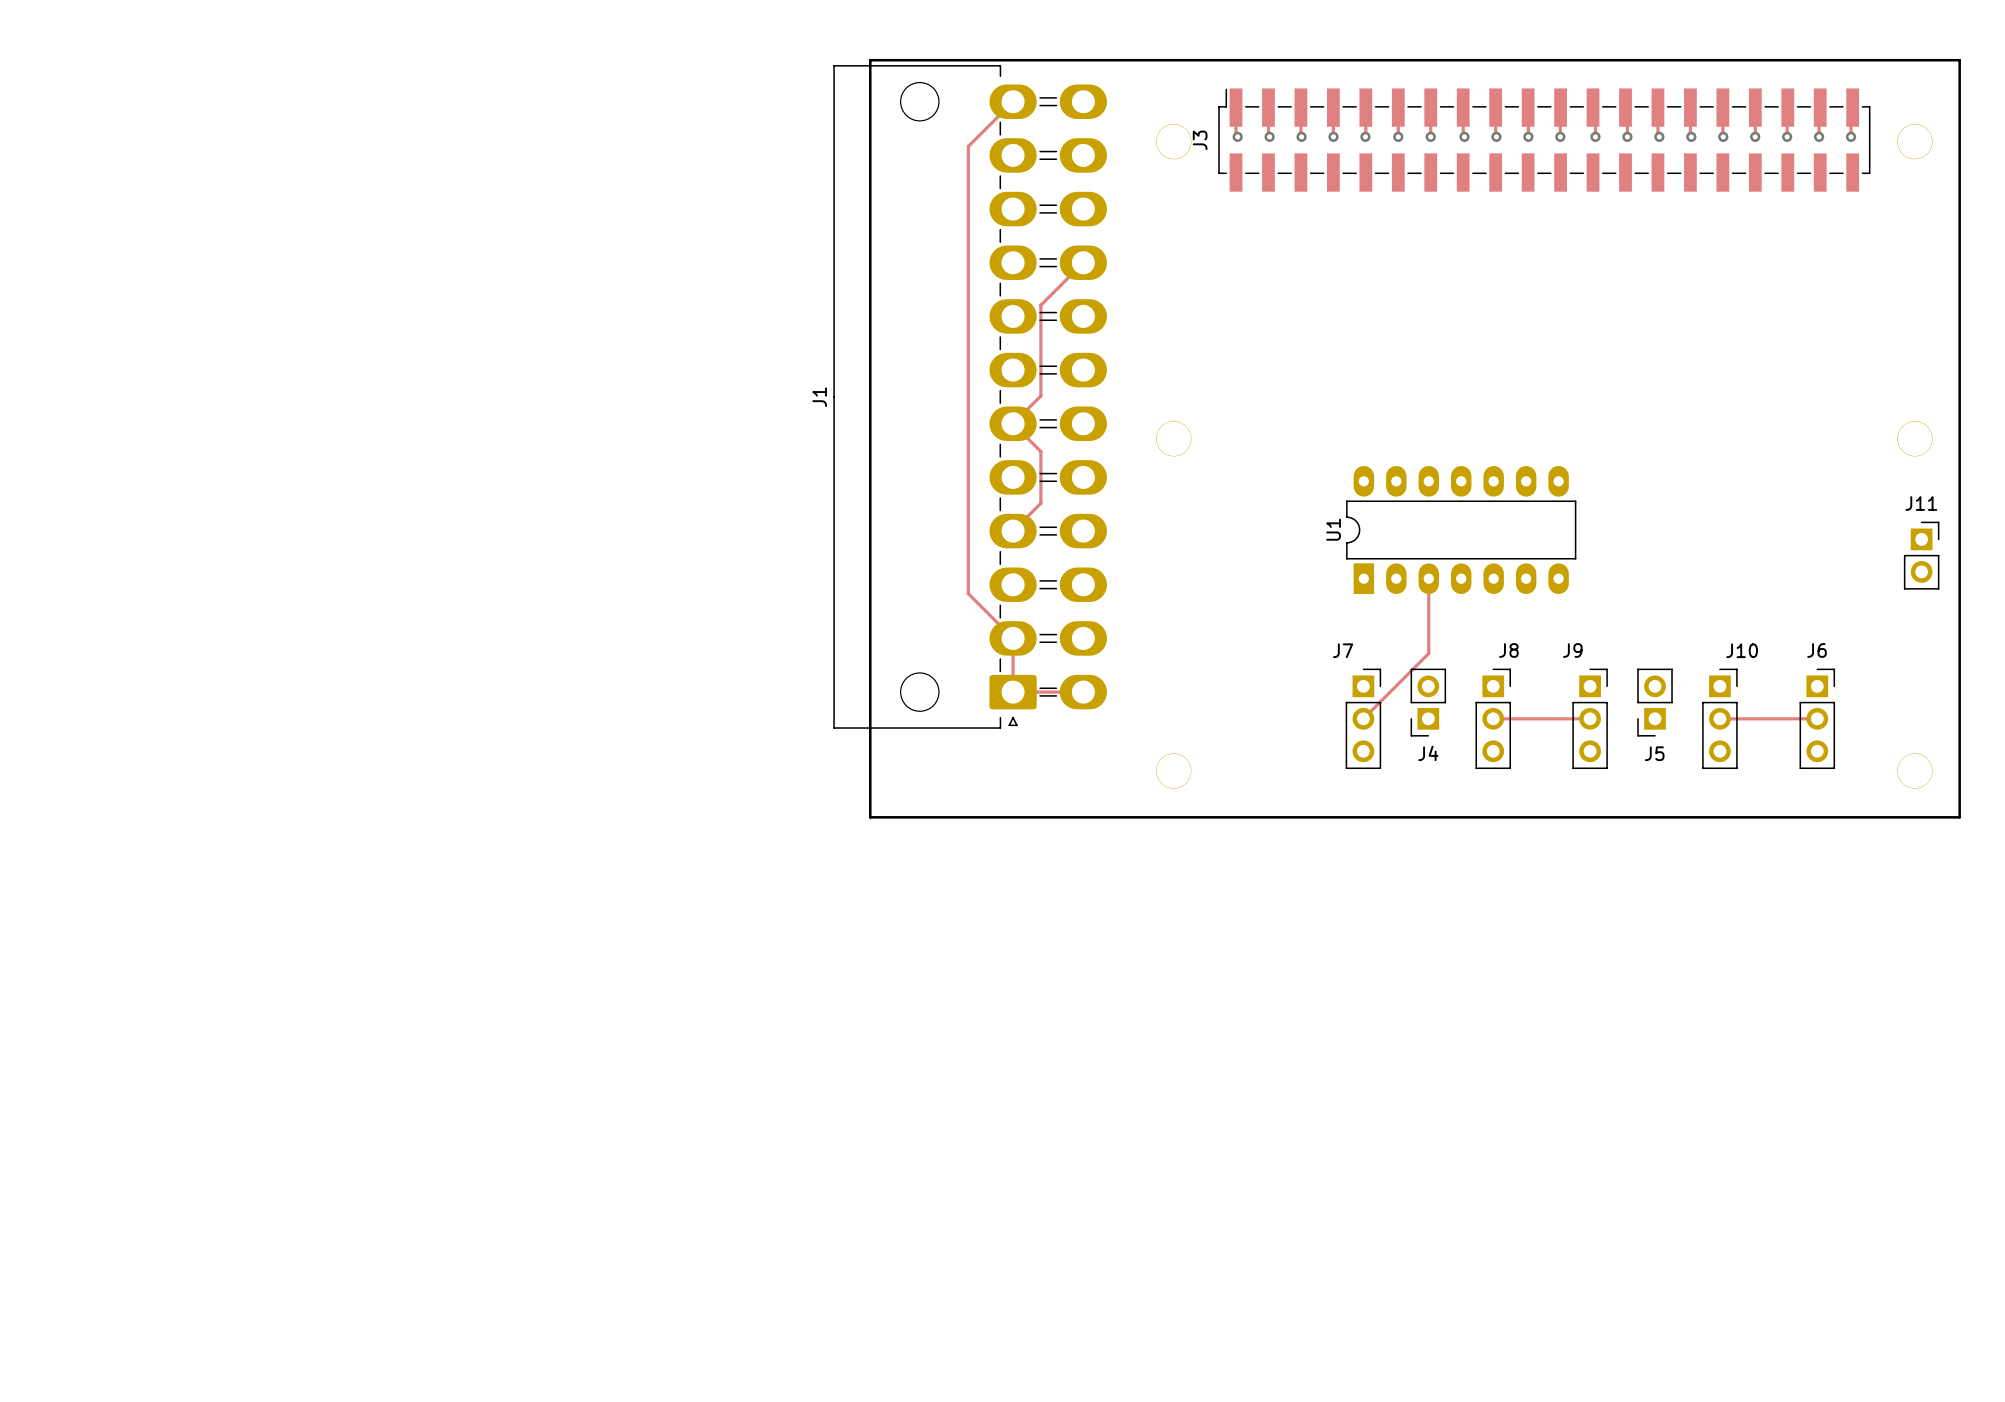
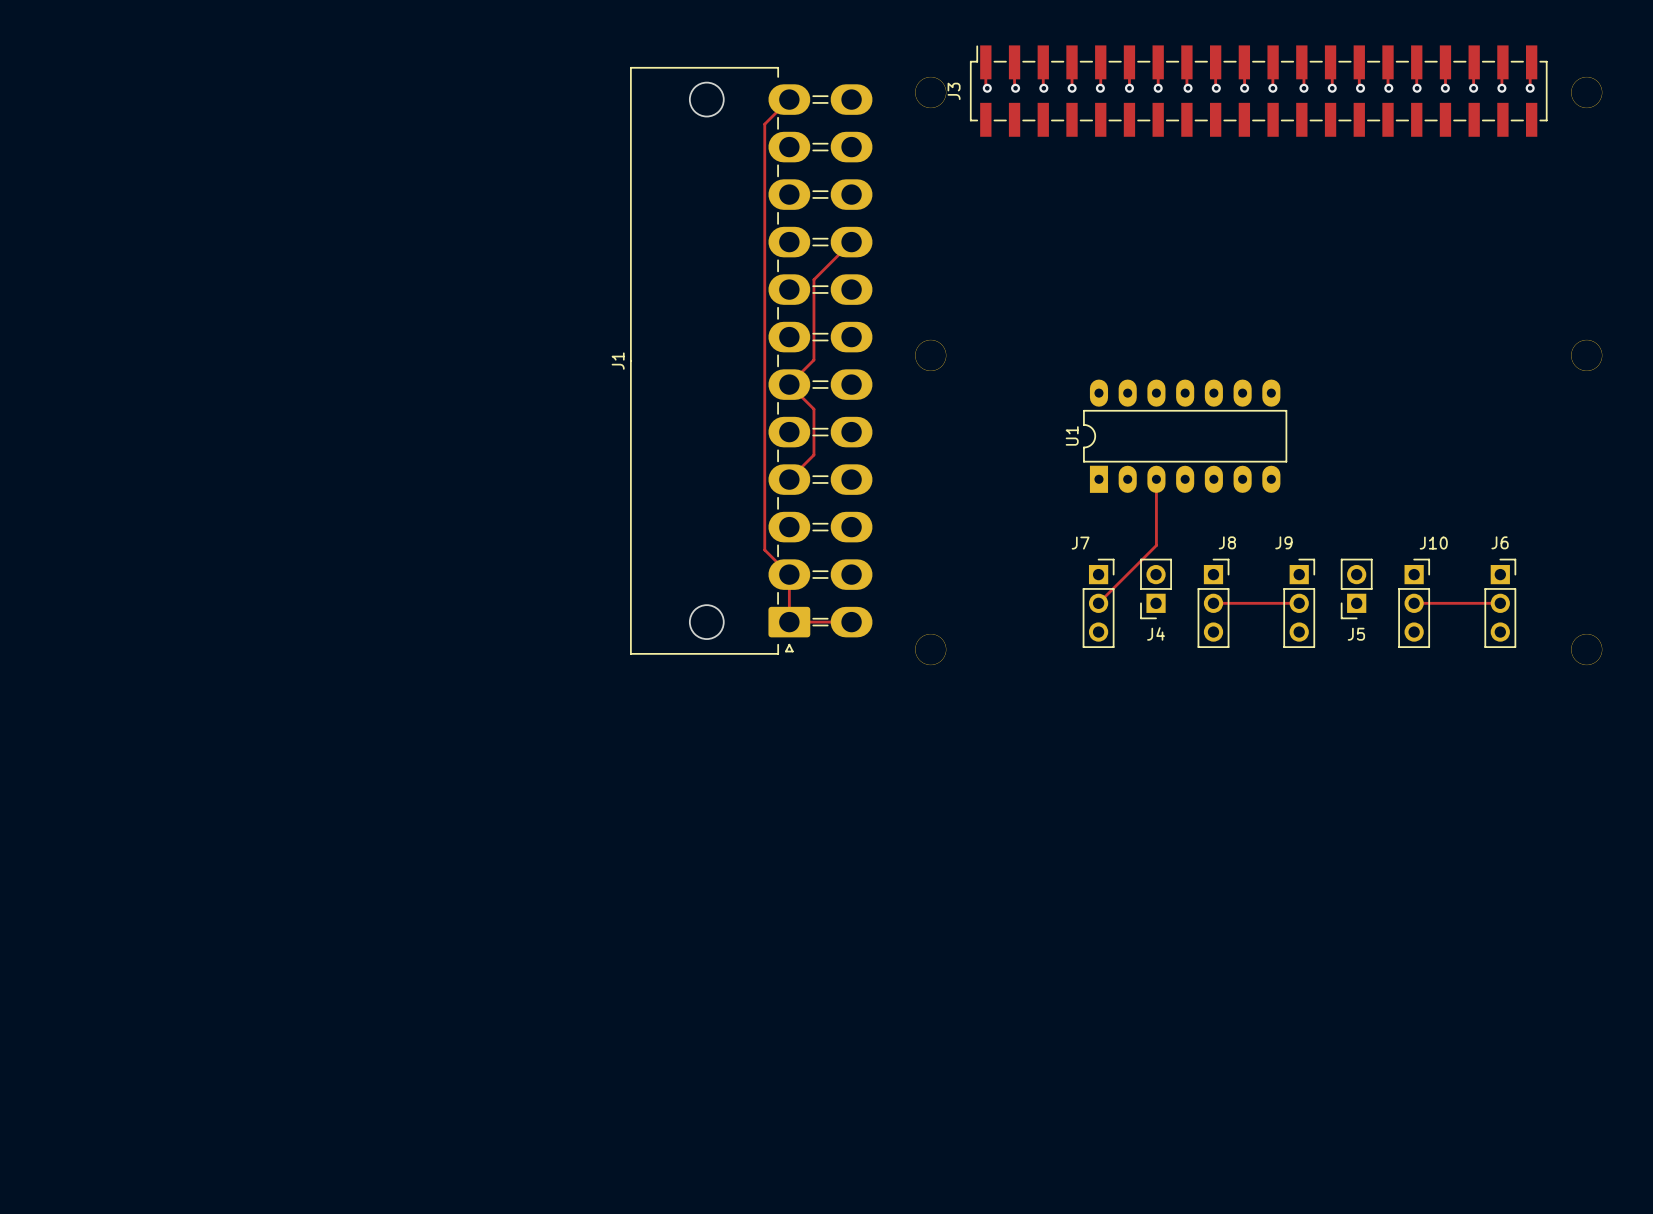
board edge: (870, 60) (1959, 60) (1959, 817) (870, 817) (870, 60) -> none
track: (1013, 101) (968, 146) (968, 593) (1013, 638) (1013, 692) (1083, 692) -> none
track: none -> (789, 99) (764, 124) (764, 550) (789, 574) (789, 622) (851, 622)
track: (1083, 262) (1040, 305) (1040, 395) (1013, 423) (1040, 451) (1040, 503) (1013, 531) -> (851, 242) (813, 279) (813, 359) (789, 384) (813, 409) (813, 454) (789, 479)
J1 position: (970, 396) -> (751, 360)
J11: (1921, 555) -> none

